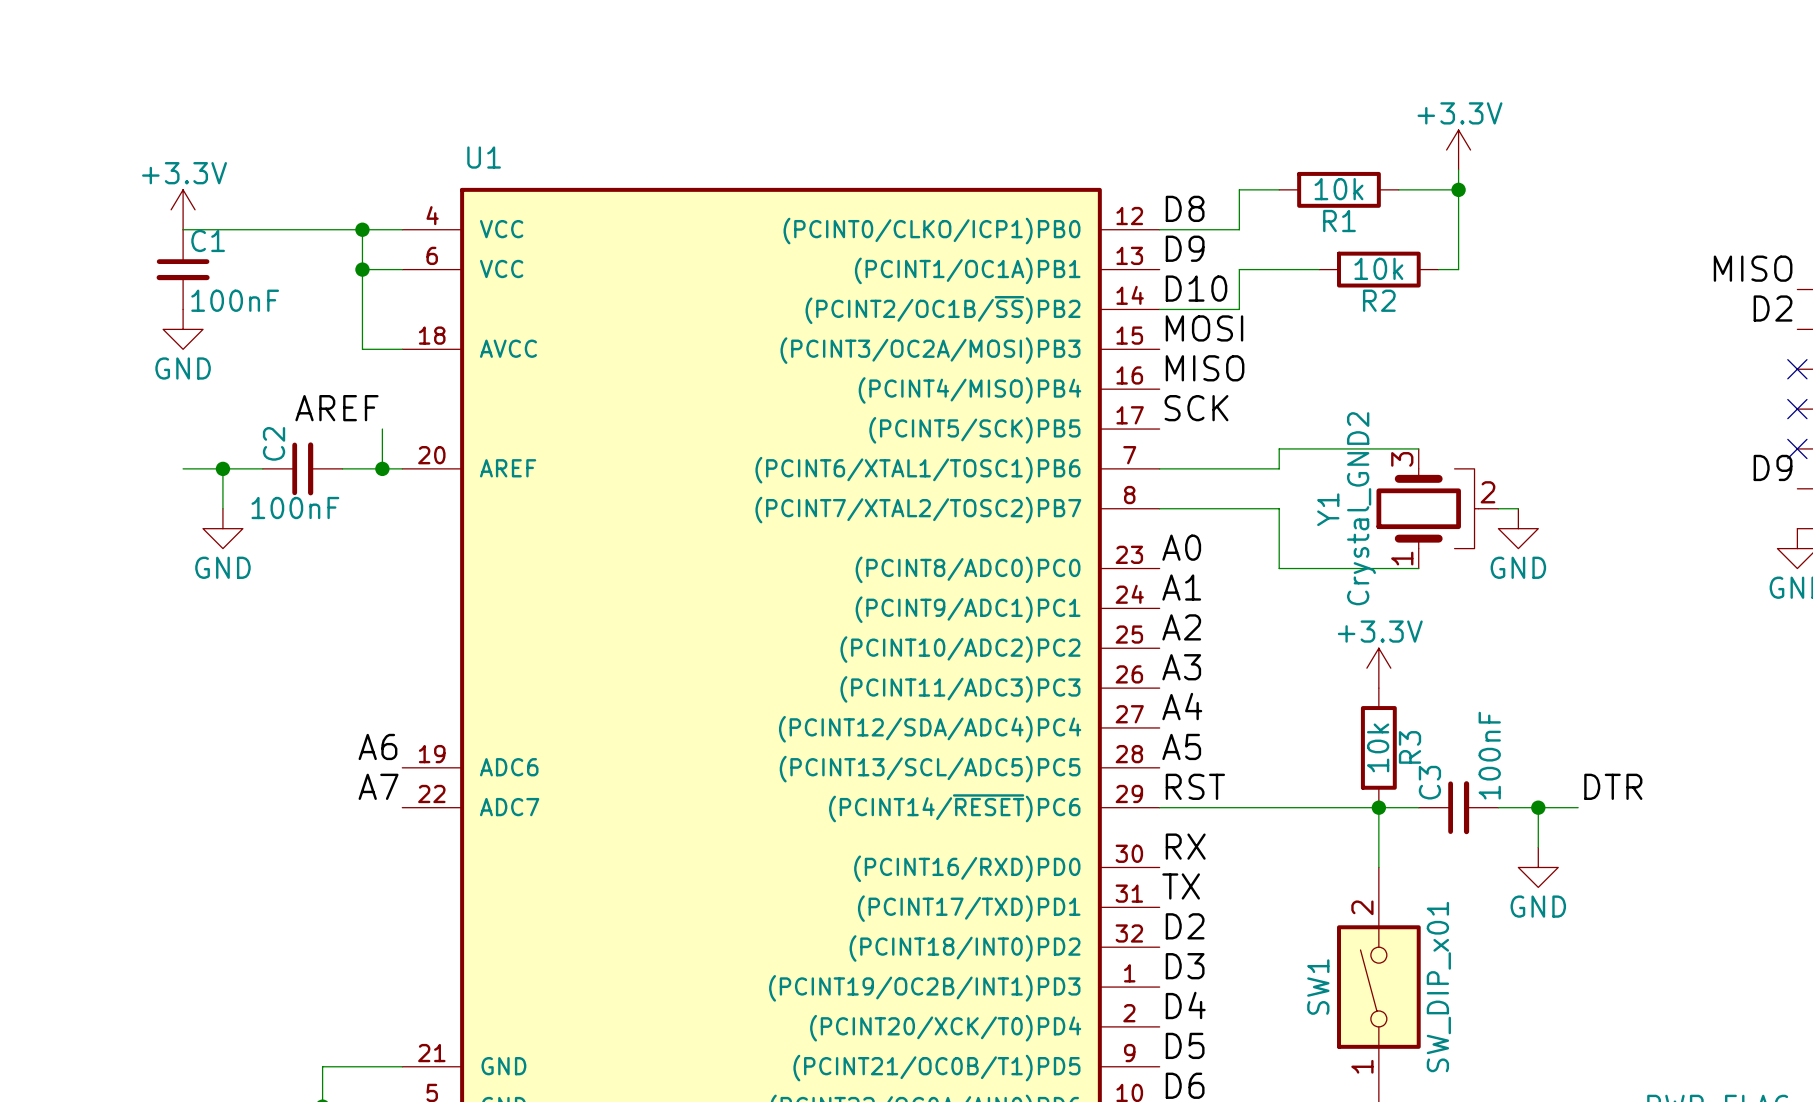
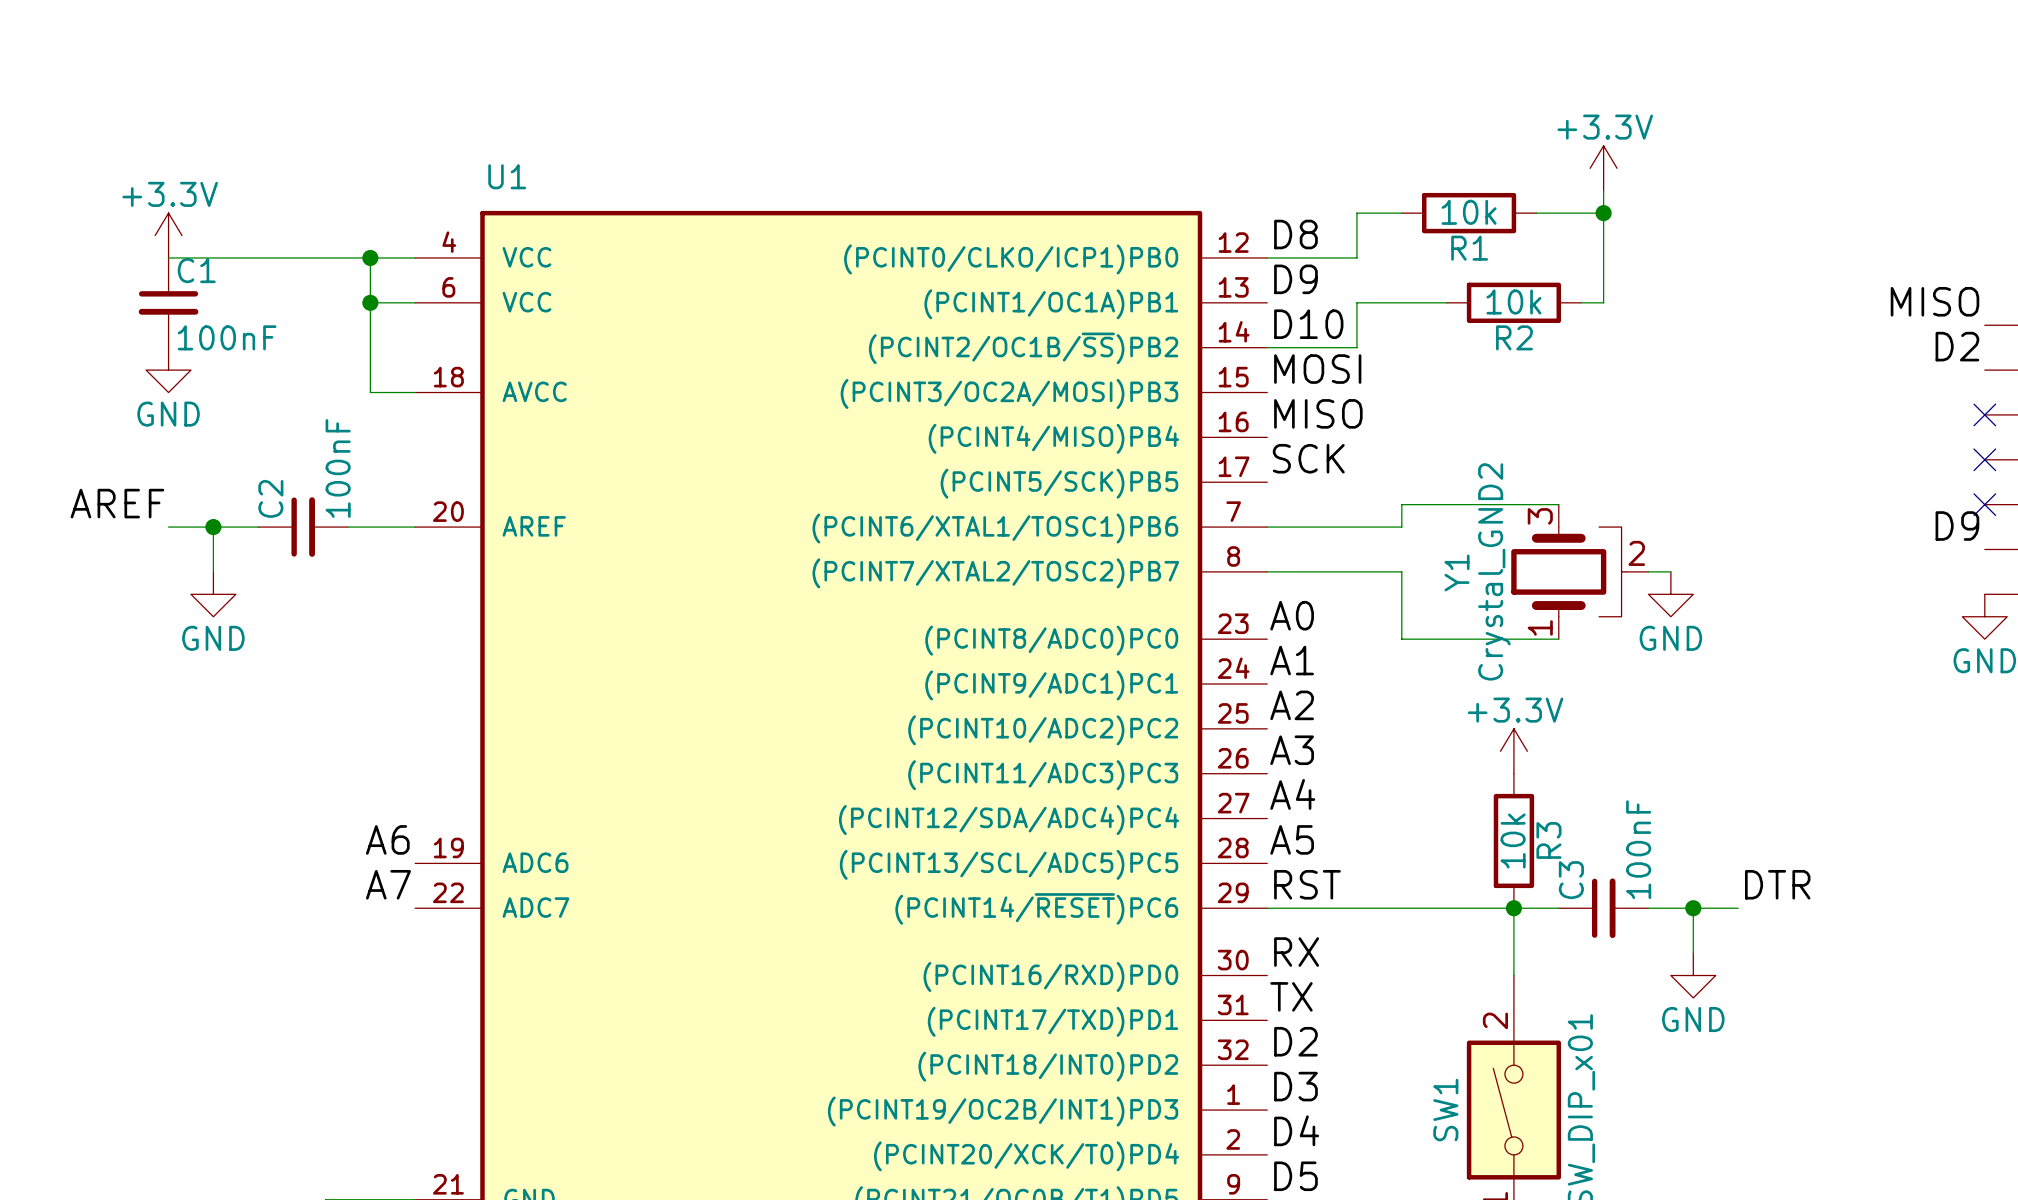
label position: AREF (336, 408) -> AREF (117, 503)
wire: (382, 429) (382, 468) -> none
junction: (382, 468) -> none
C2 value rotation: 0° (295, 508) -> 90° counterclockwise (338, 468)
C2 value position: 100nF (295, 508) -> 100nF (338, 468)

